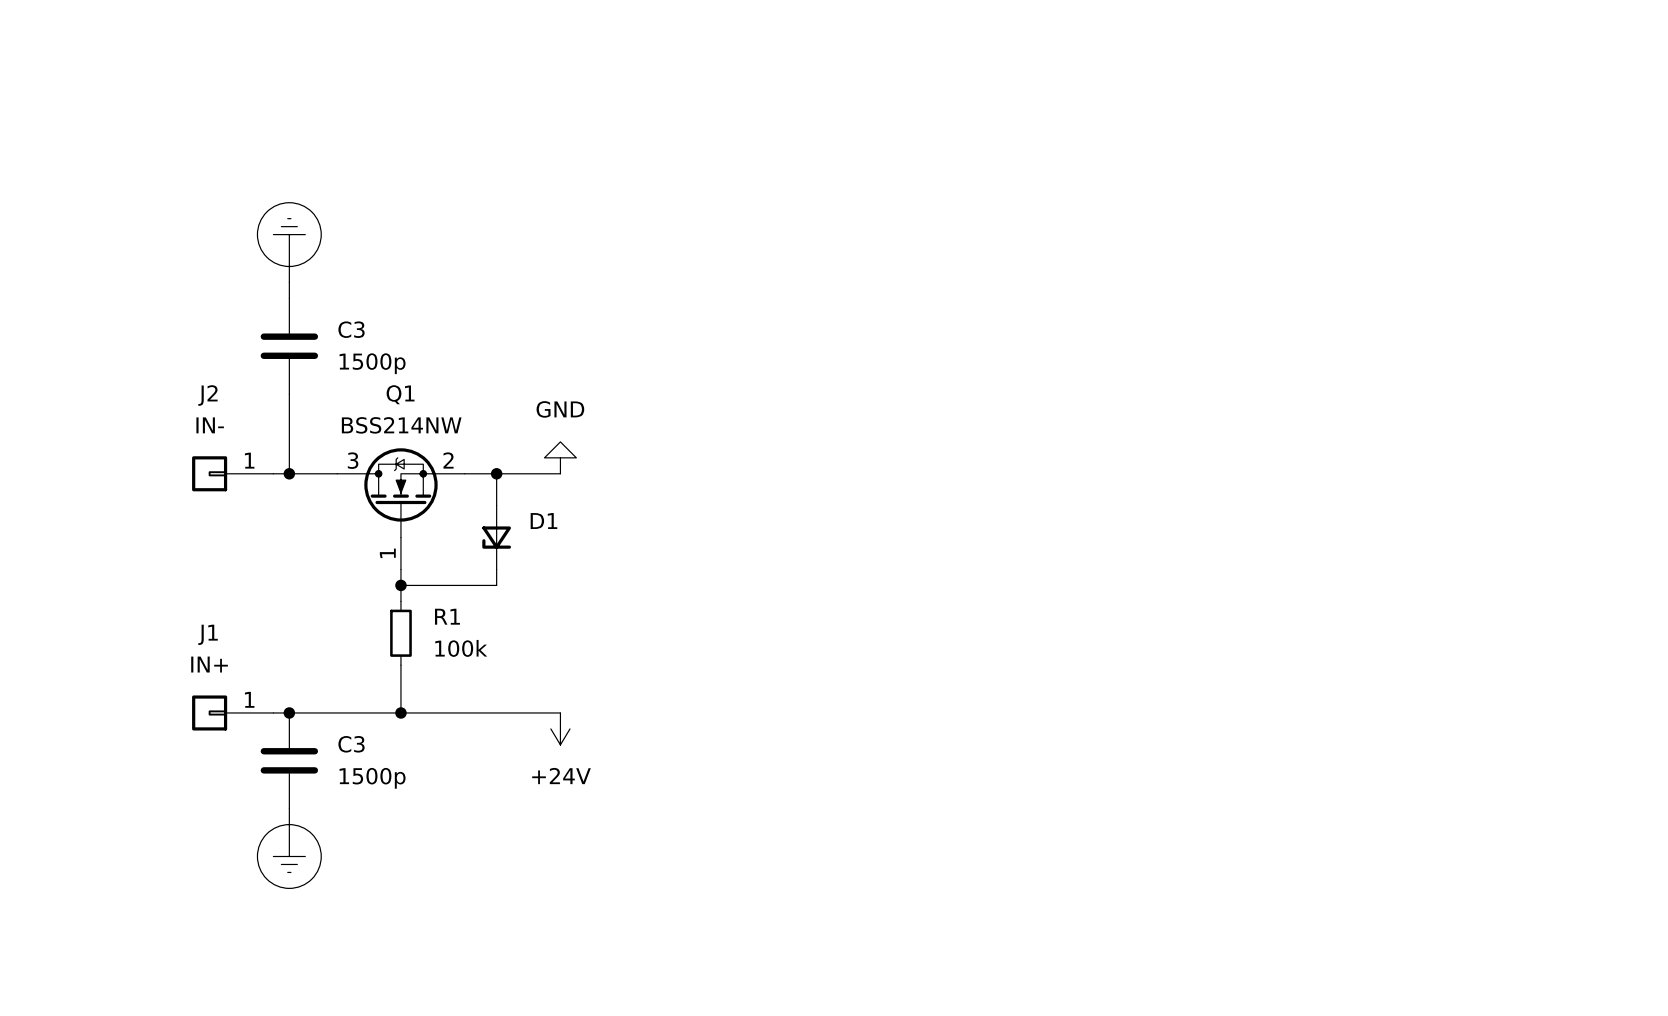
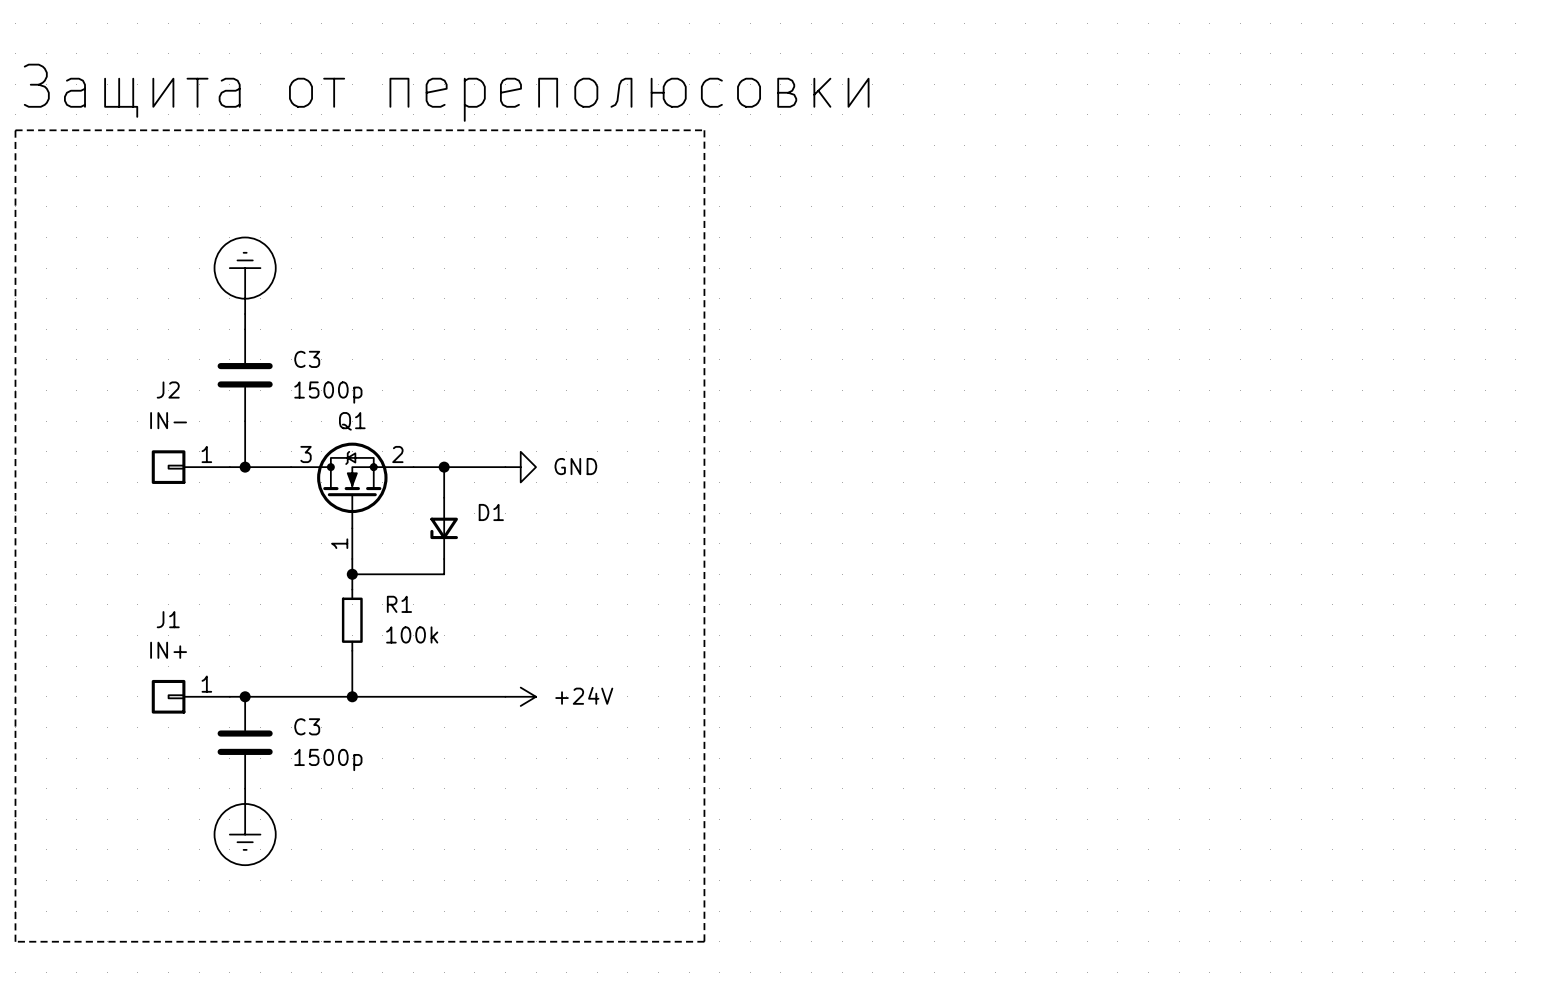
text: none -> Защита от переполюсовки (446, 92)
line: none -> (15, 130) (704, 130) (704, 941) (15, 941) (15, 130)
power symbol position: (289, 242) -> (245, 275)
C3 position: (289, 346) -> (245, 375)
Q1 name position: Q1 (400, 394) -> Q1 (352, 421)
Q1 value: BSS214NW (401, 425) -> none
power symbol rotation: 0° (560, 457) -> 90° clockwise (520, 467)
power symbol position: GND (560, 457) -> GND (520, 467)
power symbol rotation: 0° (560, 728) -> 90° counterclockwise (520, 696)
power symbol position: +24V (560, 728) -> +24V (520, 696)

